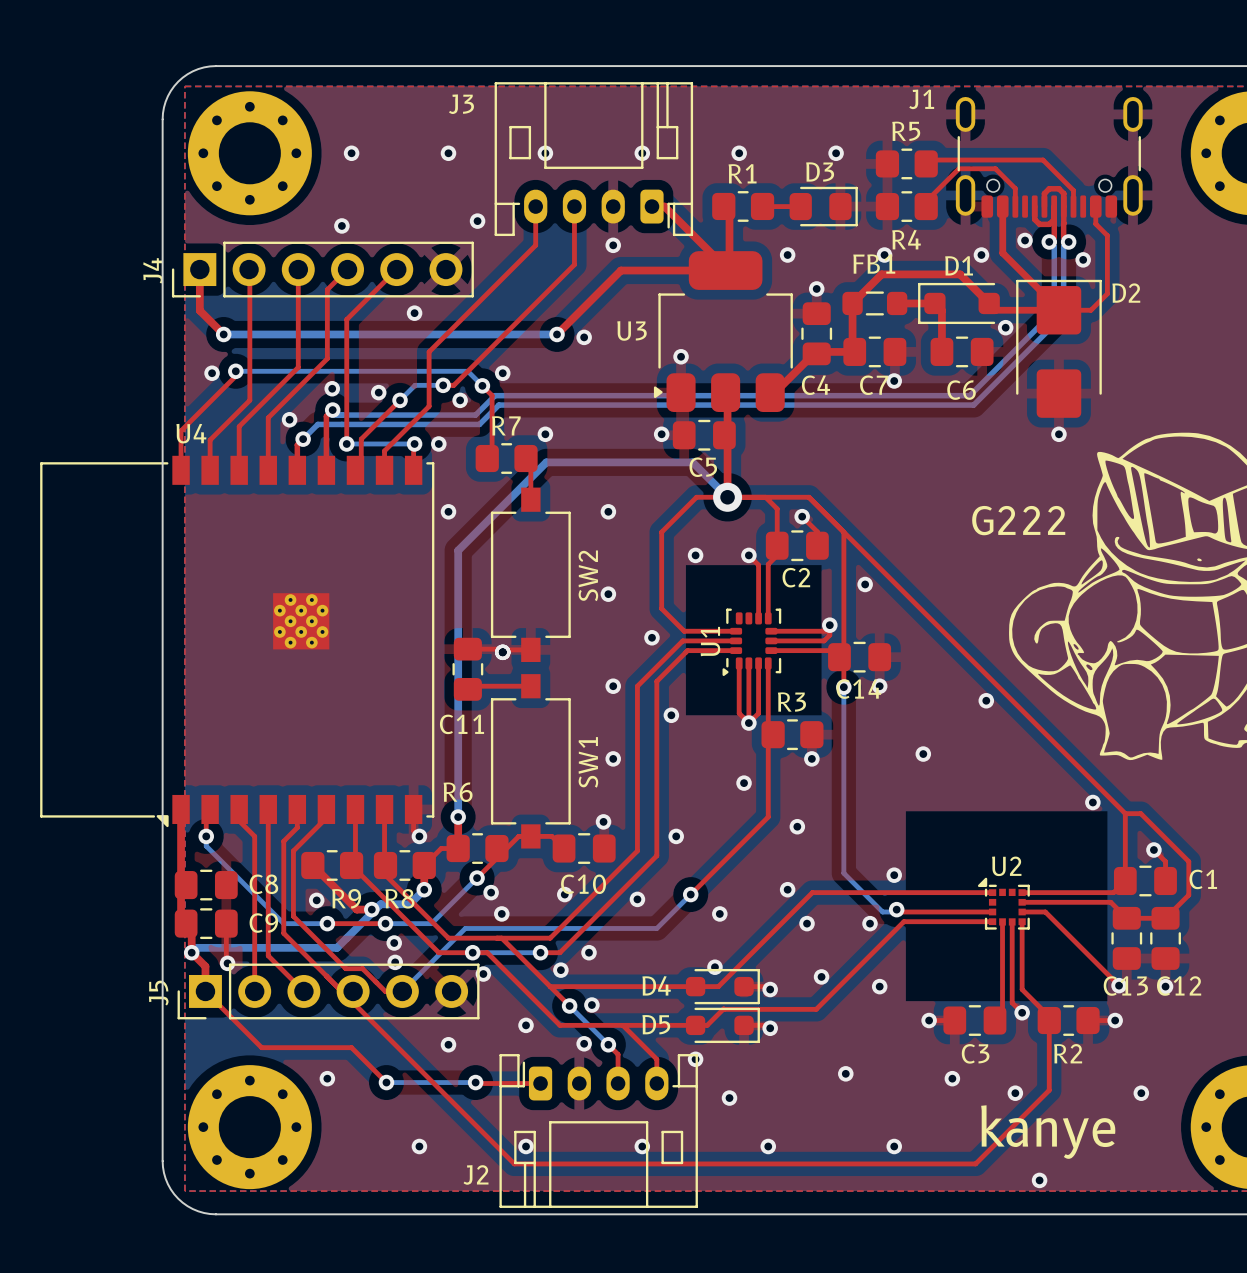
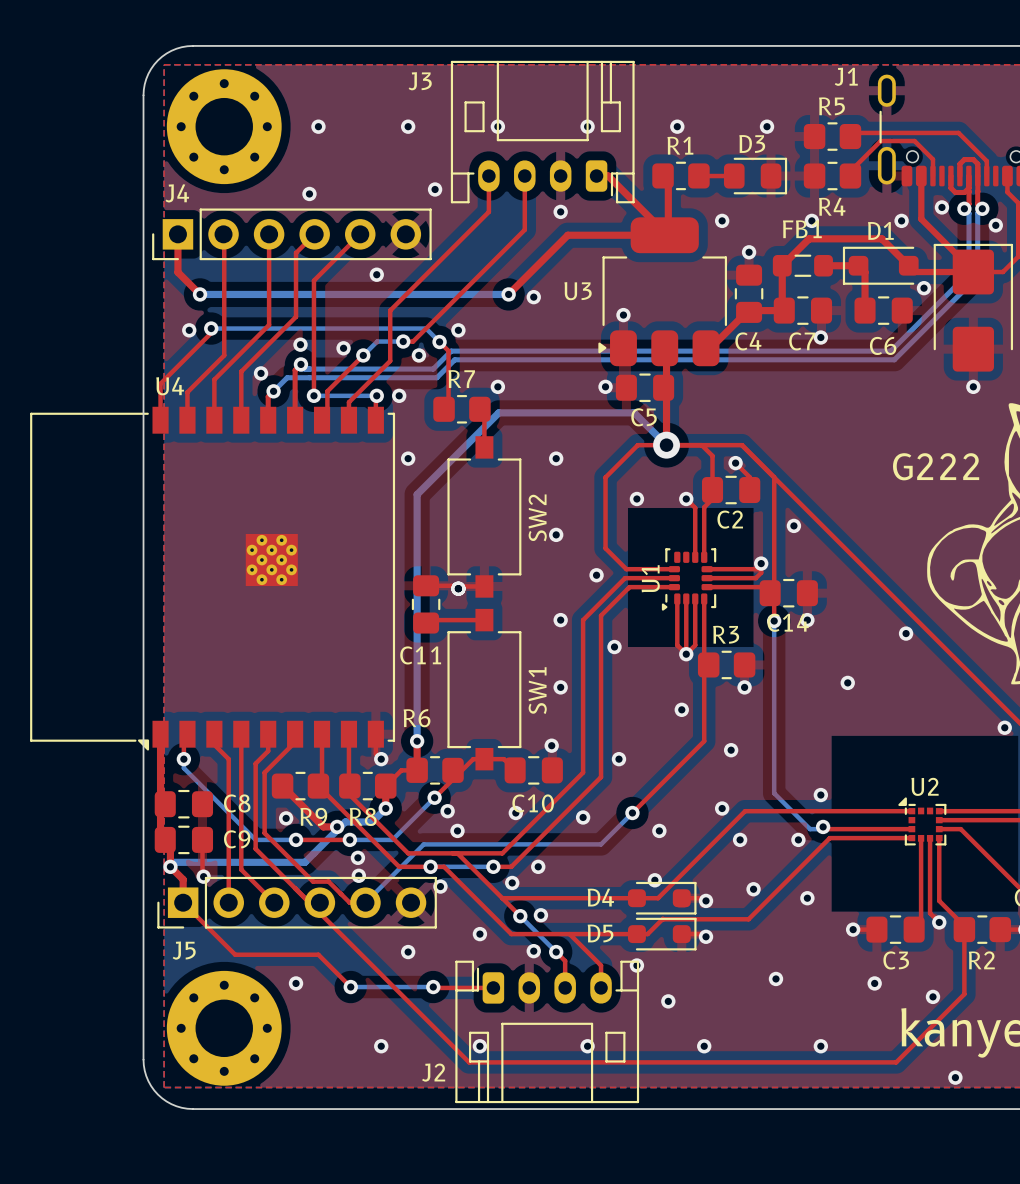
J4 name rotation: 0° (153, 270) -> 90° clockwise (177, 193)
J4 name position: J4 (153, 270) -> J4 (177, 193)
J5 name rotation: 0° (158, 993) -> 90° clockwise (184, 950)
J5 name position: J5 (158, 993) -> J5 (184, 950)

